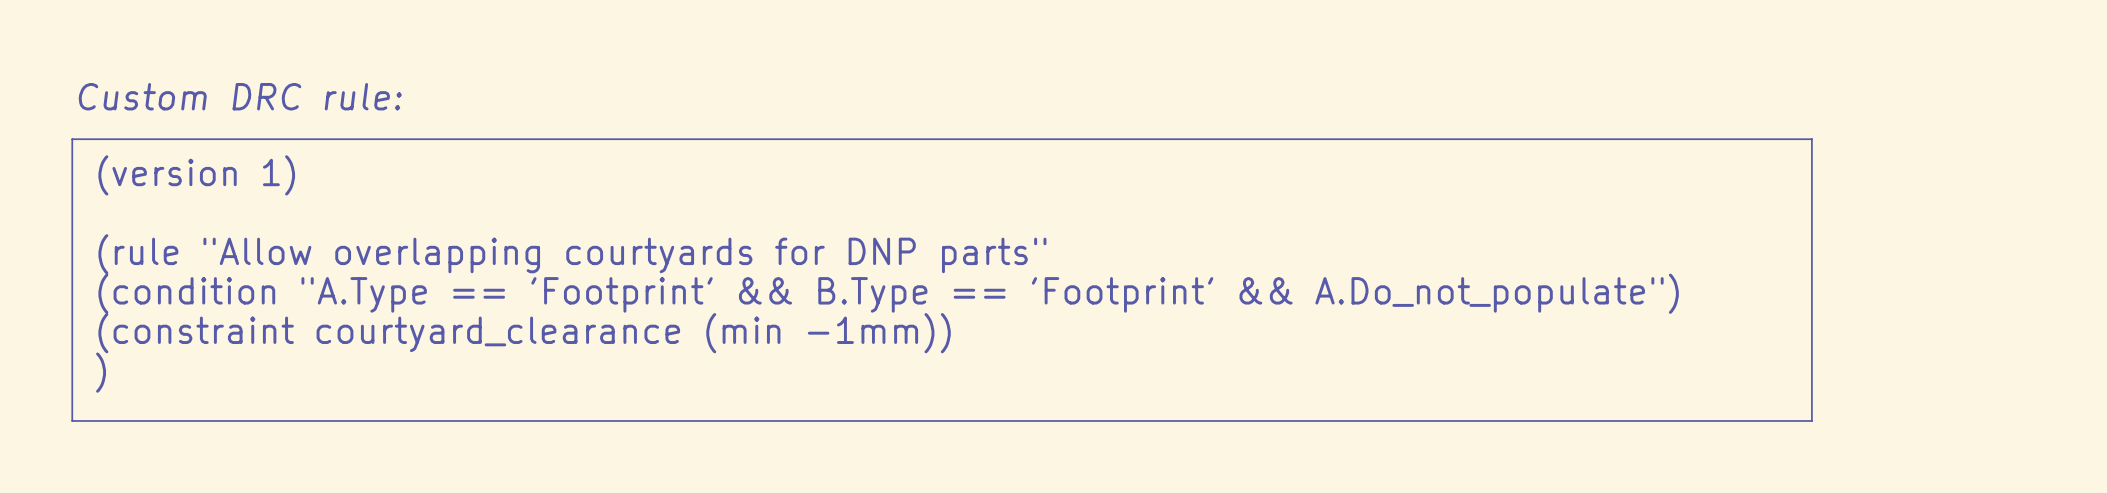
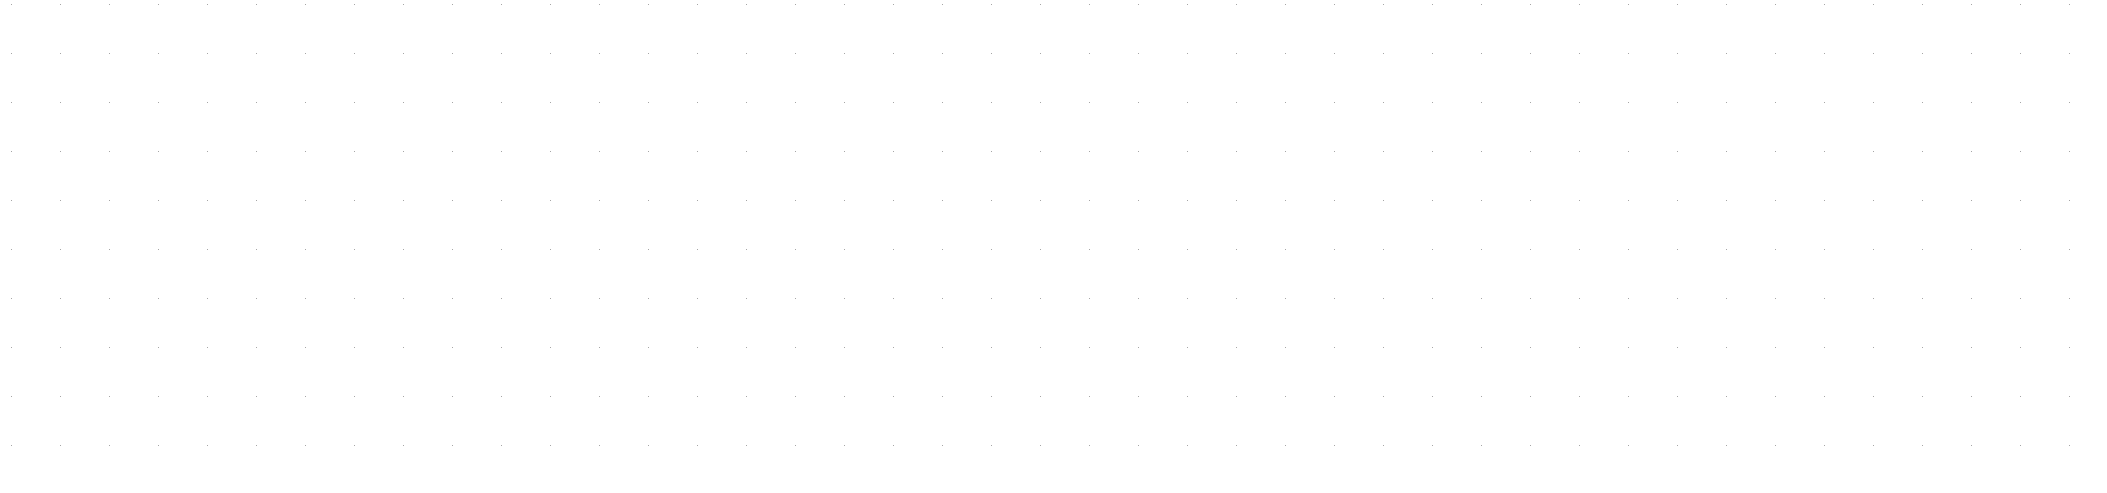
text: Custom DRC rule: (240, 96) -> none
line: (72, 139) (1811, 139) (1811, 420) (72, 420) (72, 139) -> none
text: (version 1) (196, 175) -> none
text: (rule "Allow overlapping courtyards for DNP parts" (572, 254) -> none
text: (condition "A.Type == 'Footprint' && B.Type == 'Footprint' && A.Do_not_populate") (888, 293) -> none
text: (constraint courtyard_clearance (min -1mm)) (524, 333) -> none
text: ) (101, 372) -> none

